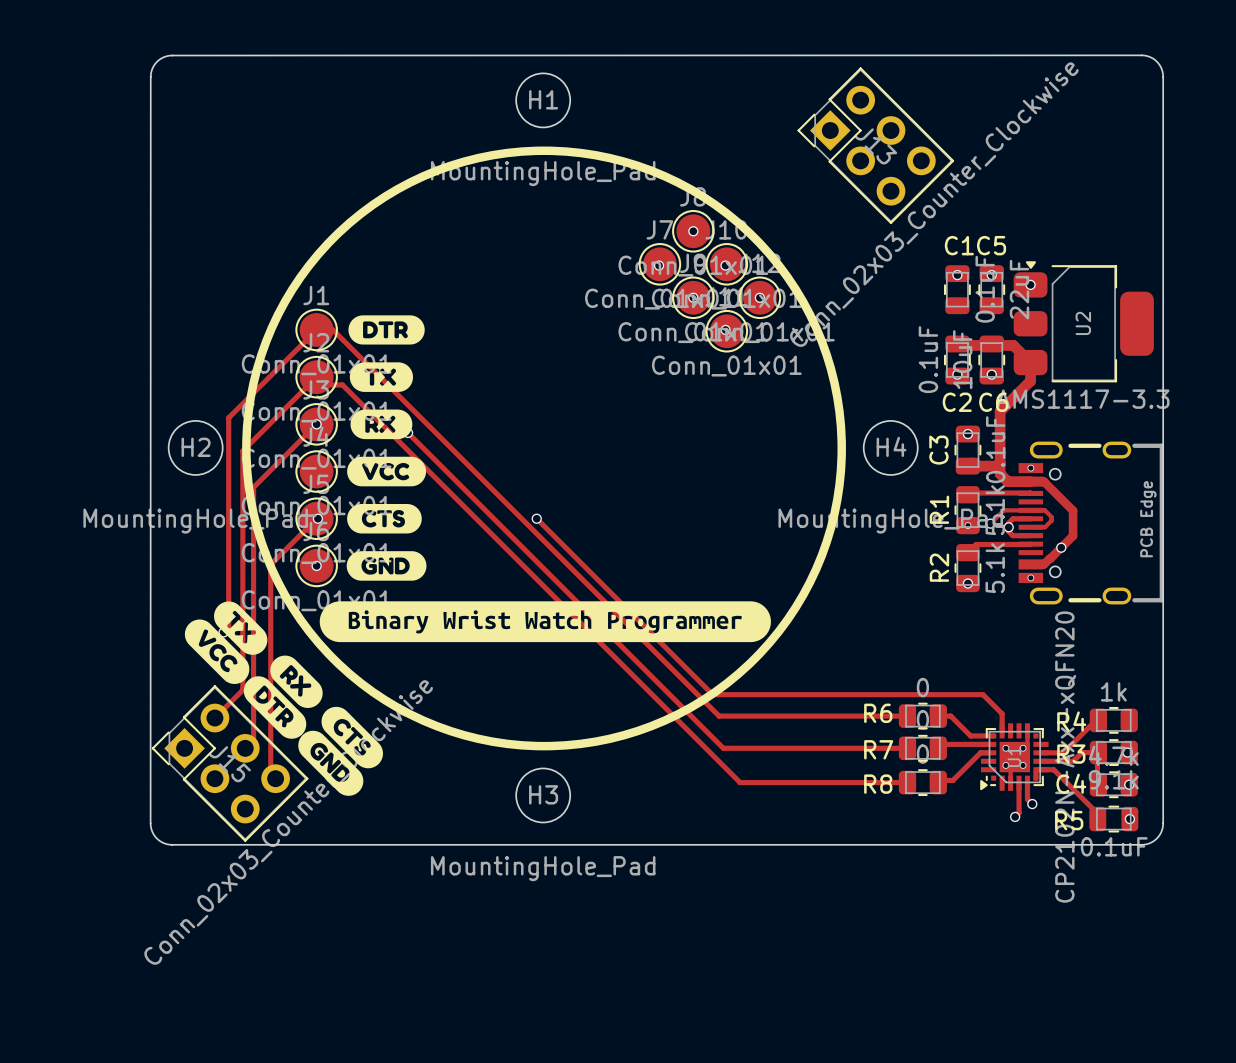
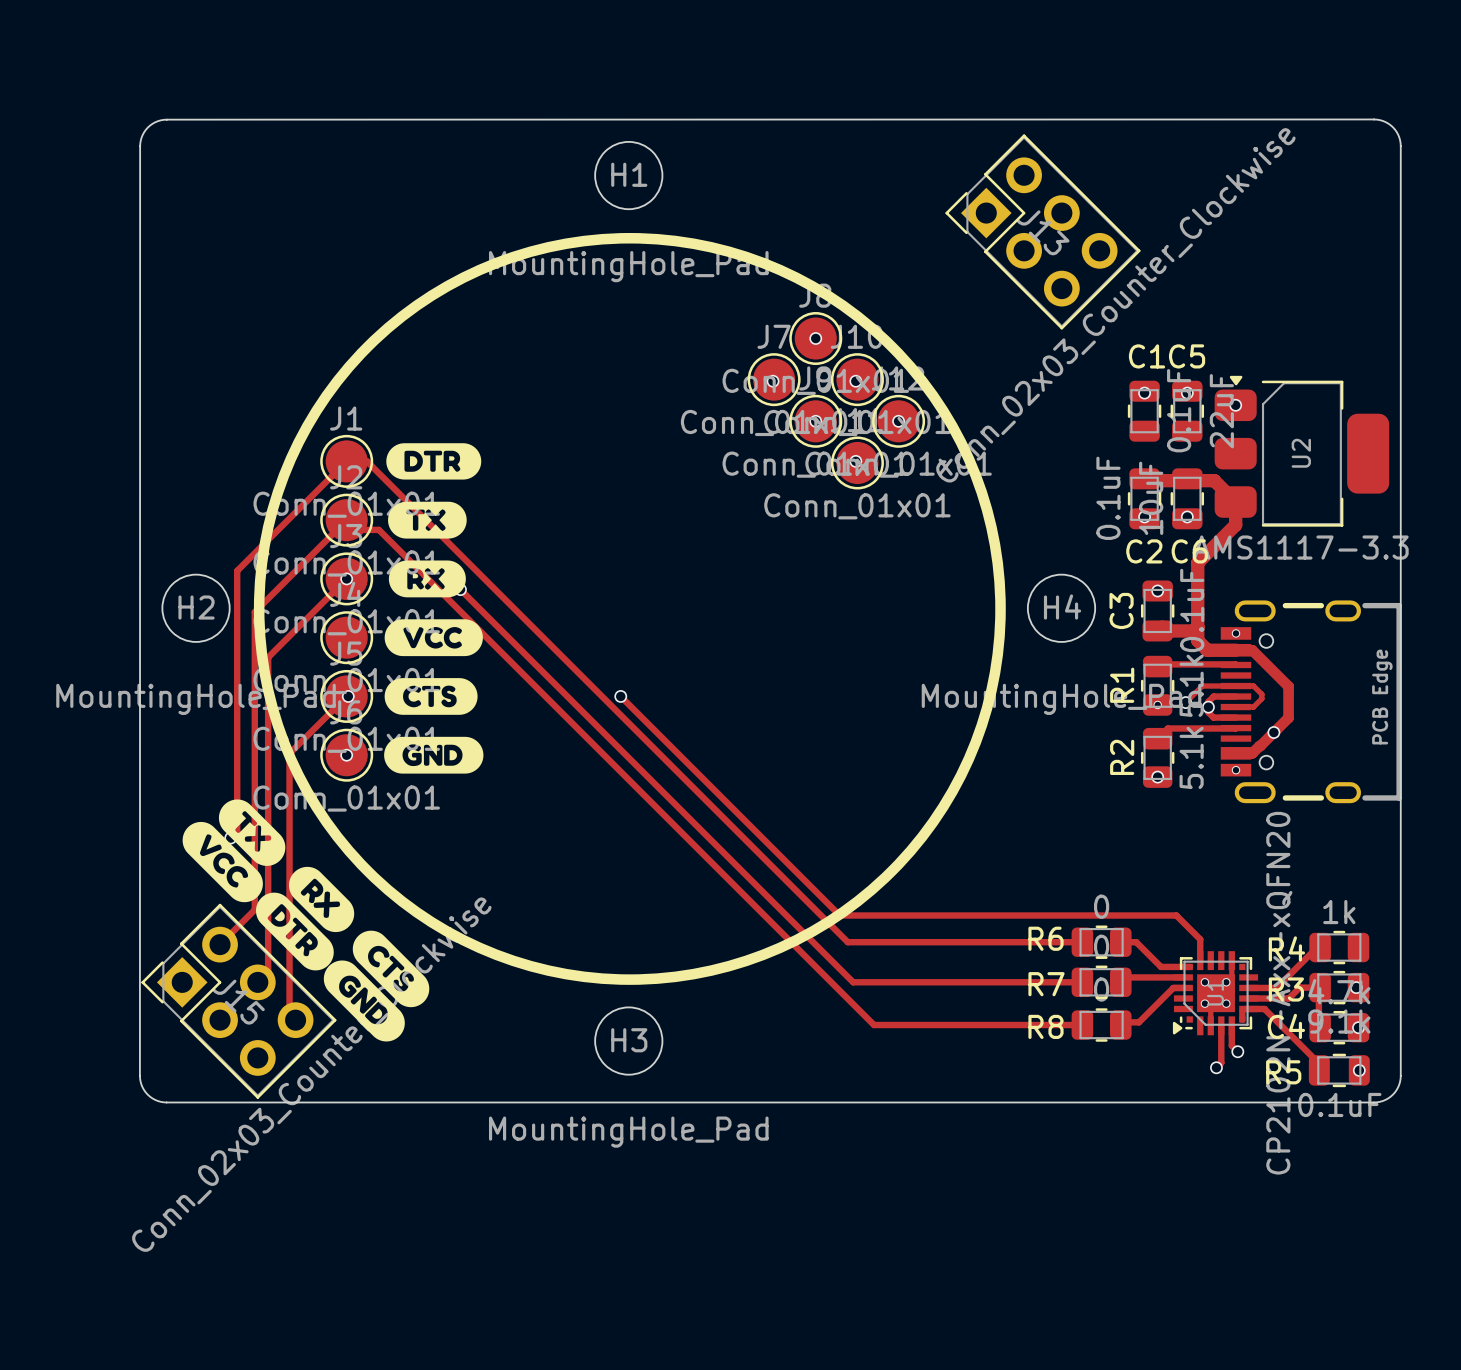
drawing: [319, 601, 771, 643] -> none

